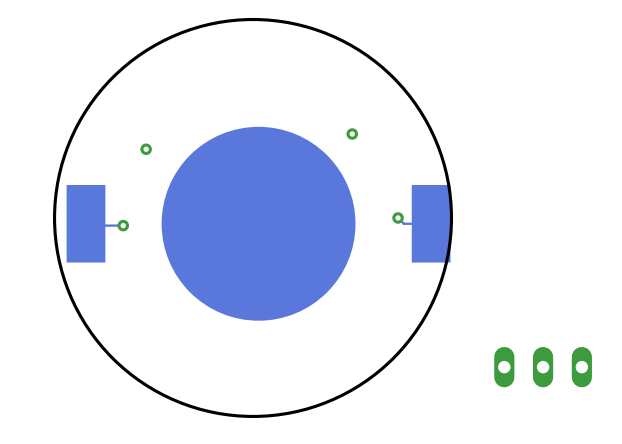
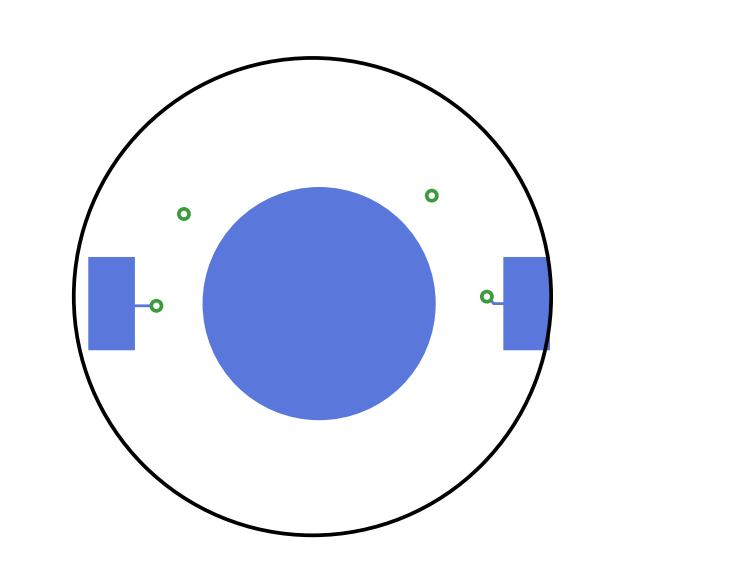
part: (543, 367) -> none

